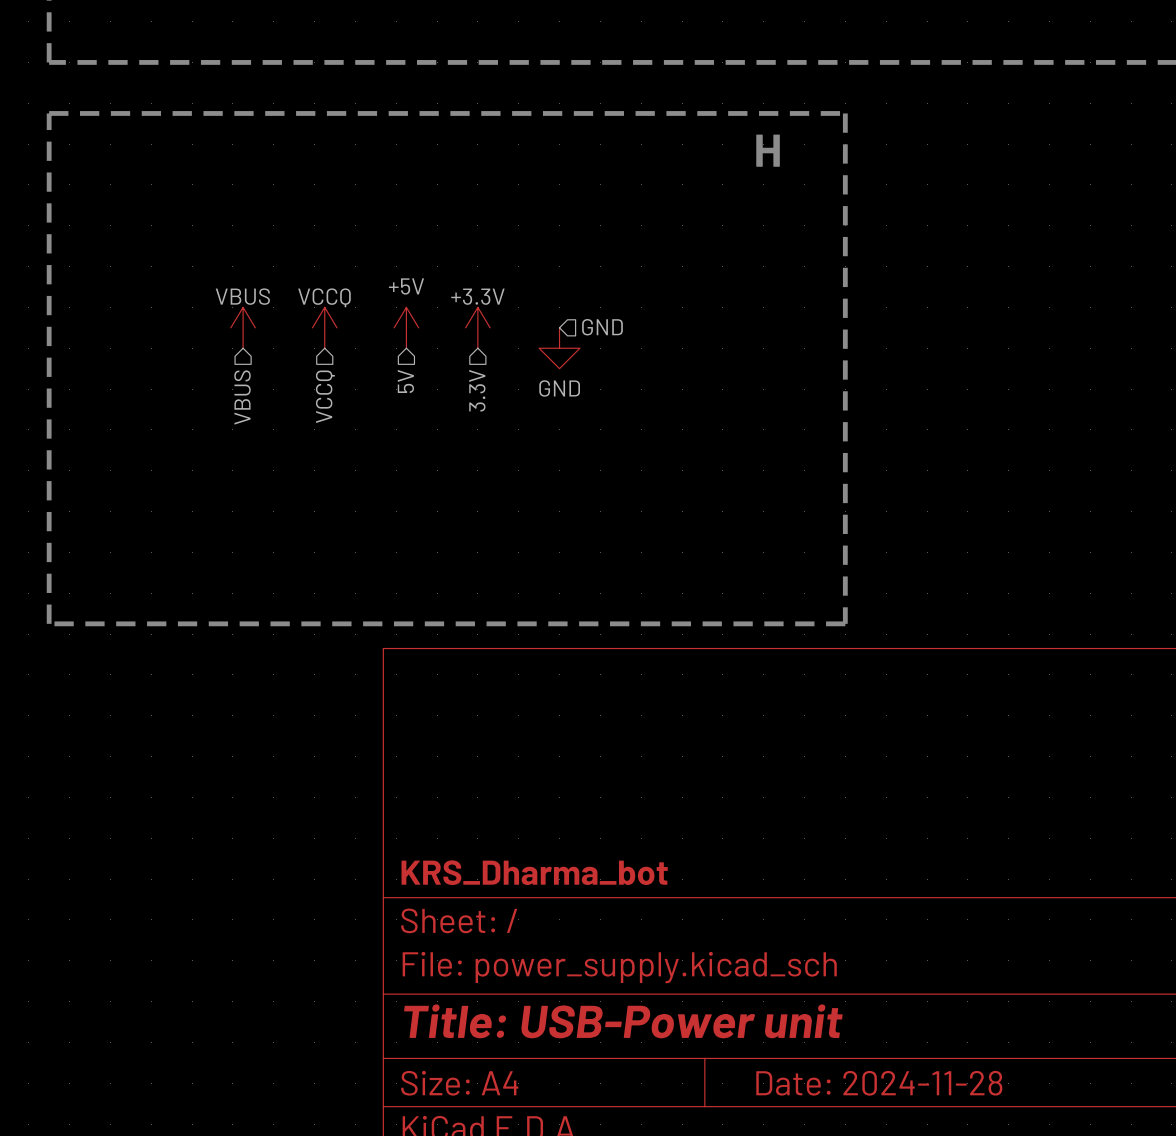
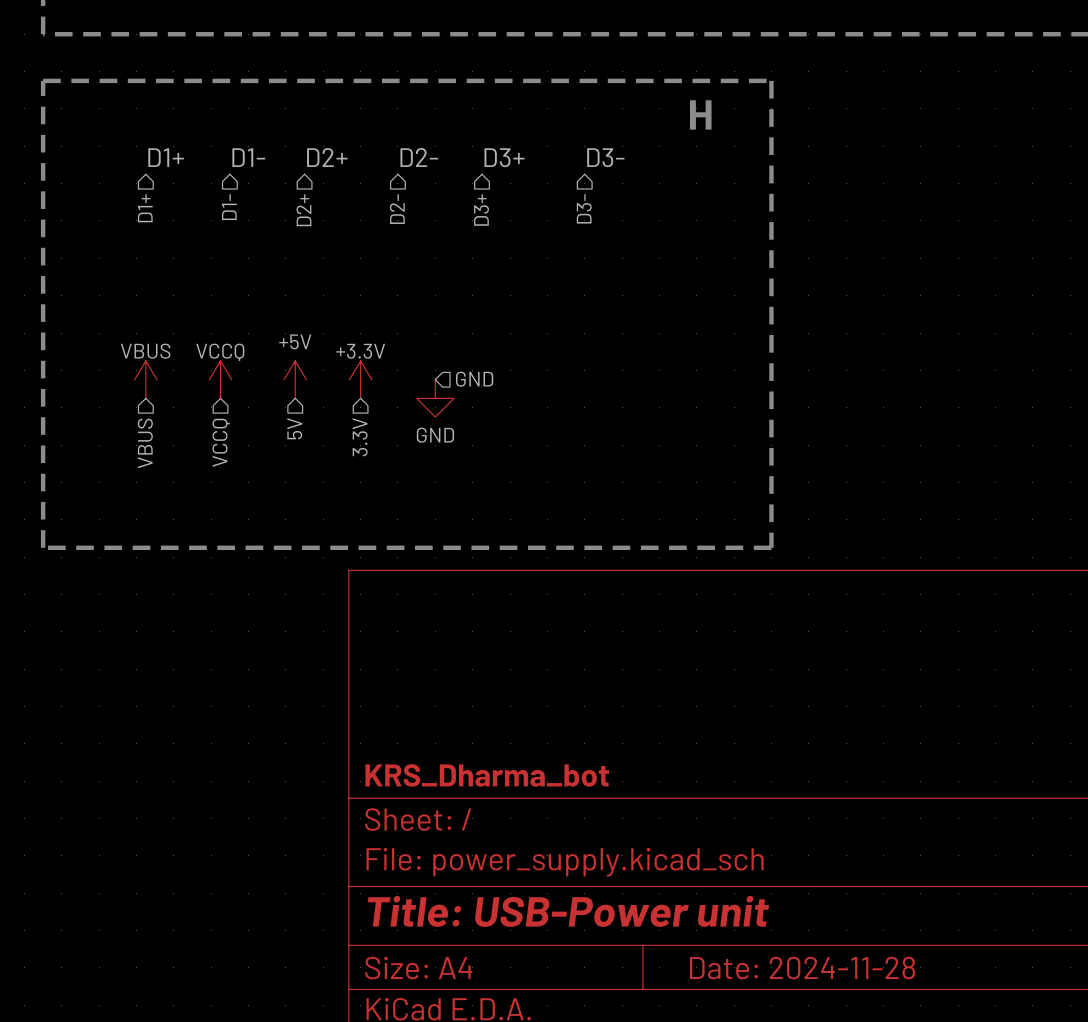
label: none -> D1+ (166, 157)
label: none -> D1- (248, 157)
label: none -> D2+ (327, 157)
label: none -> D2- (419, 157)
label: none -> D3+ (504, 157)
label: none -> D3- (605, 157)
hierarchical label: none -> D1- (229, 207)
hierarchical label: none -> D1+ (145, 208)
hierarchical label: none -> D2- (397, 209)
hierarchical label: none -> D3- (584, 208)
hierarchical label: none -> D2+ (303, 210)
hierarchical label: none -> D3+ (481, 210)
power symbol position: VBUS (243, 327) -> VBUS (145, 379)
power symbol position: VCCQ (324, 327) -> VCCQ (220, 379)
power symbol position: +5V (406, 327) -> +5V (295, 379)
power symbol position: +3.3V (477, 327) -> +3.3V (360, 379)
hierarchical label position: GND (602, 327) -> GND (474, 379)
power symbol position: GND (559, 348) -> GND (435, 398)
hierarchical label position: 5V (405, 381) -> 5V (294, 428)
hierarchical label position: 3.3V (477, 390) -> 3.3V (360, 437)
hierarchical label position: VCCQ (325, 396) -> VCCQ (221, 442)
hierarchical label position: VBUS (242, 397) -> VBUS (145, 443)

